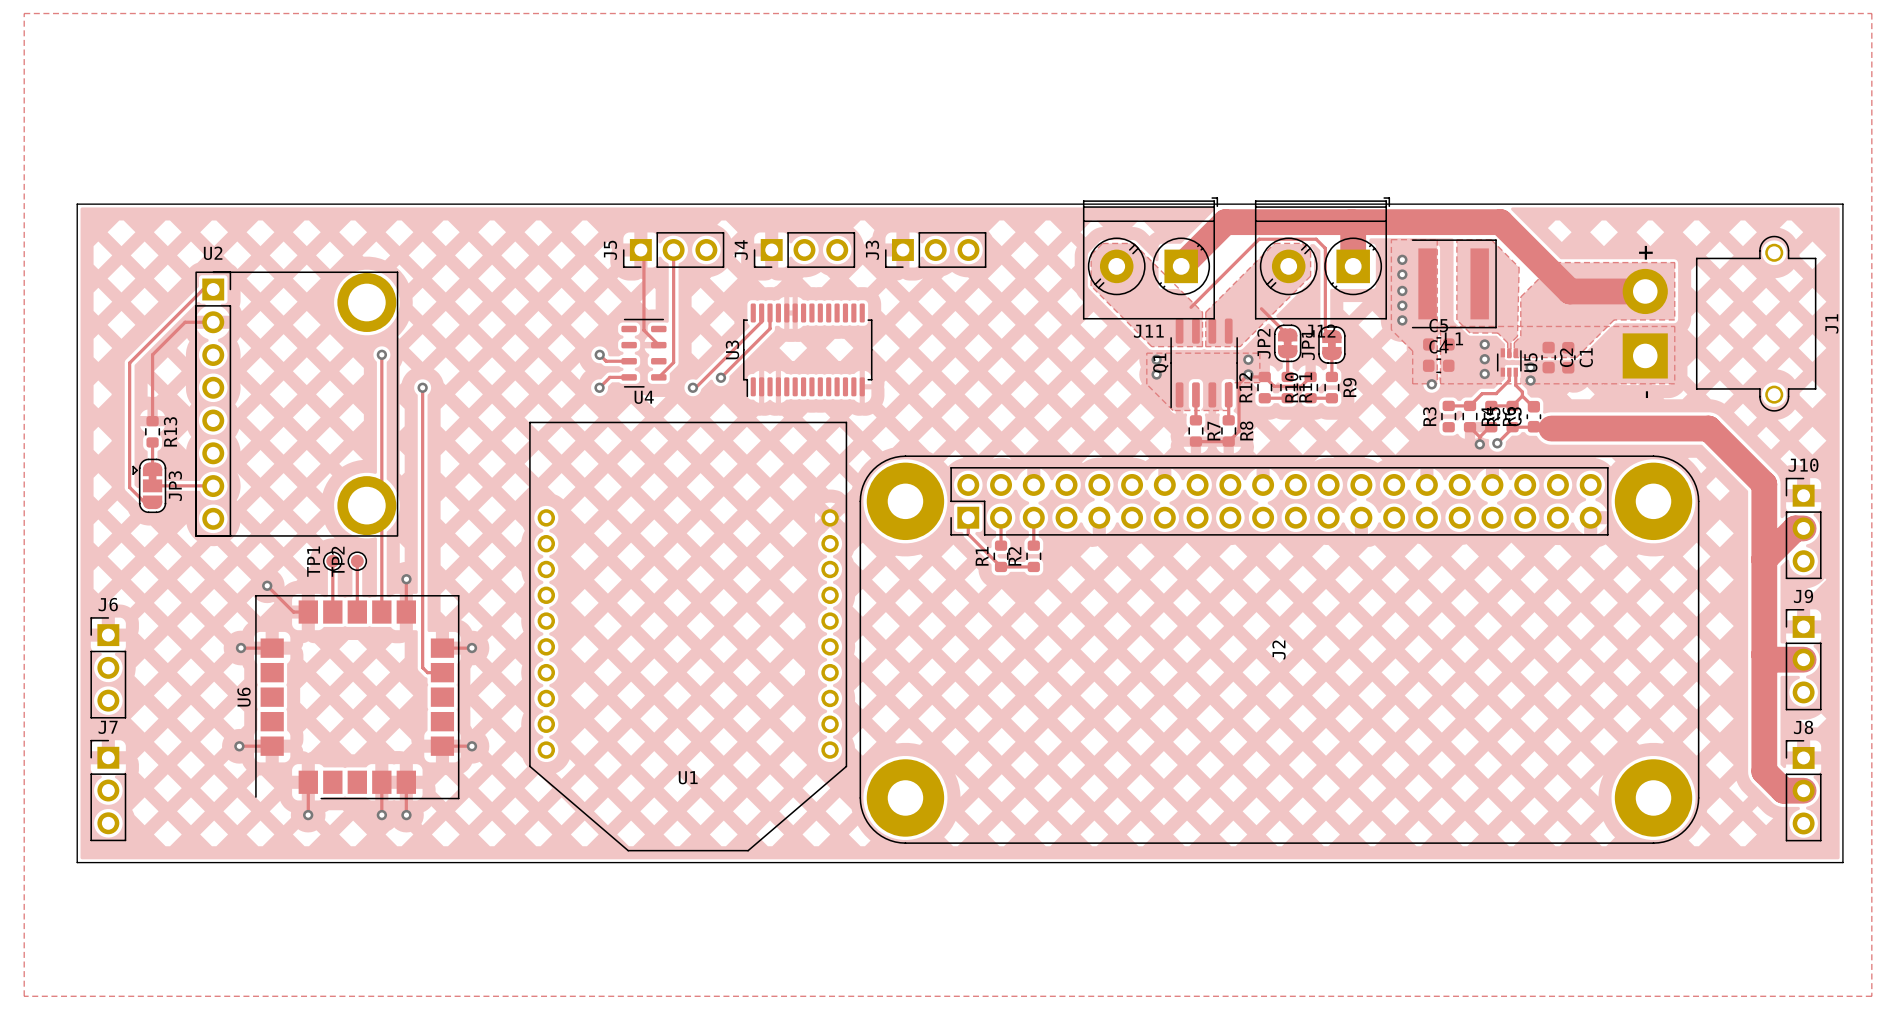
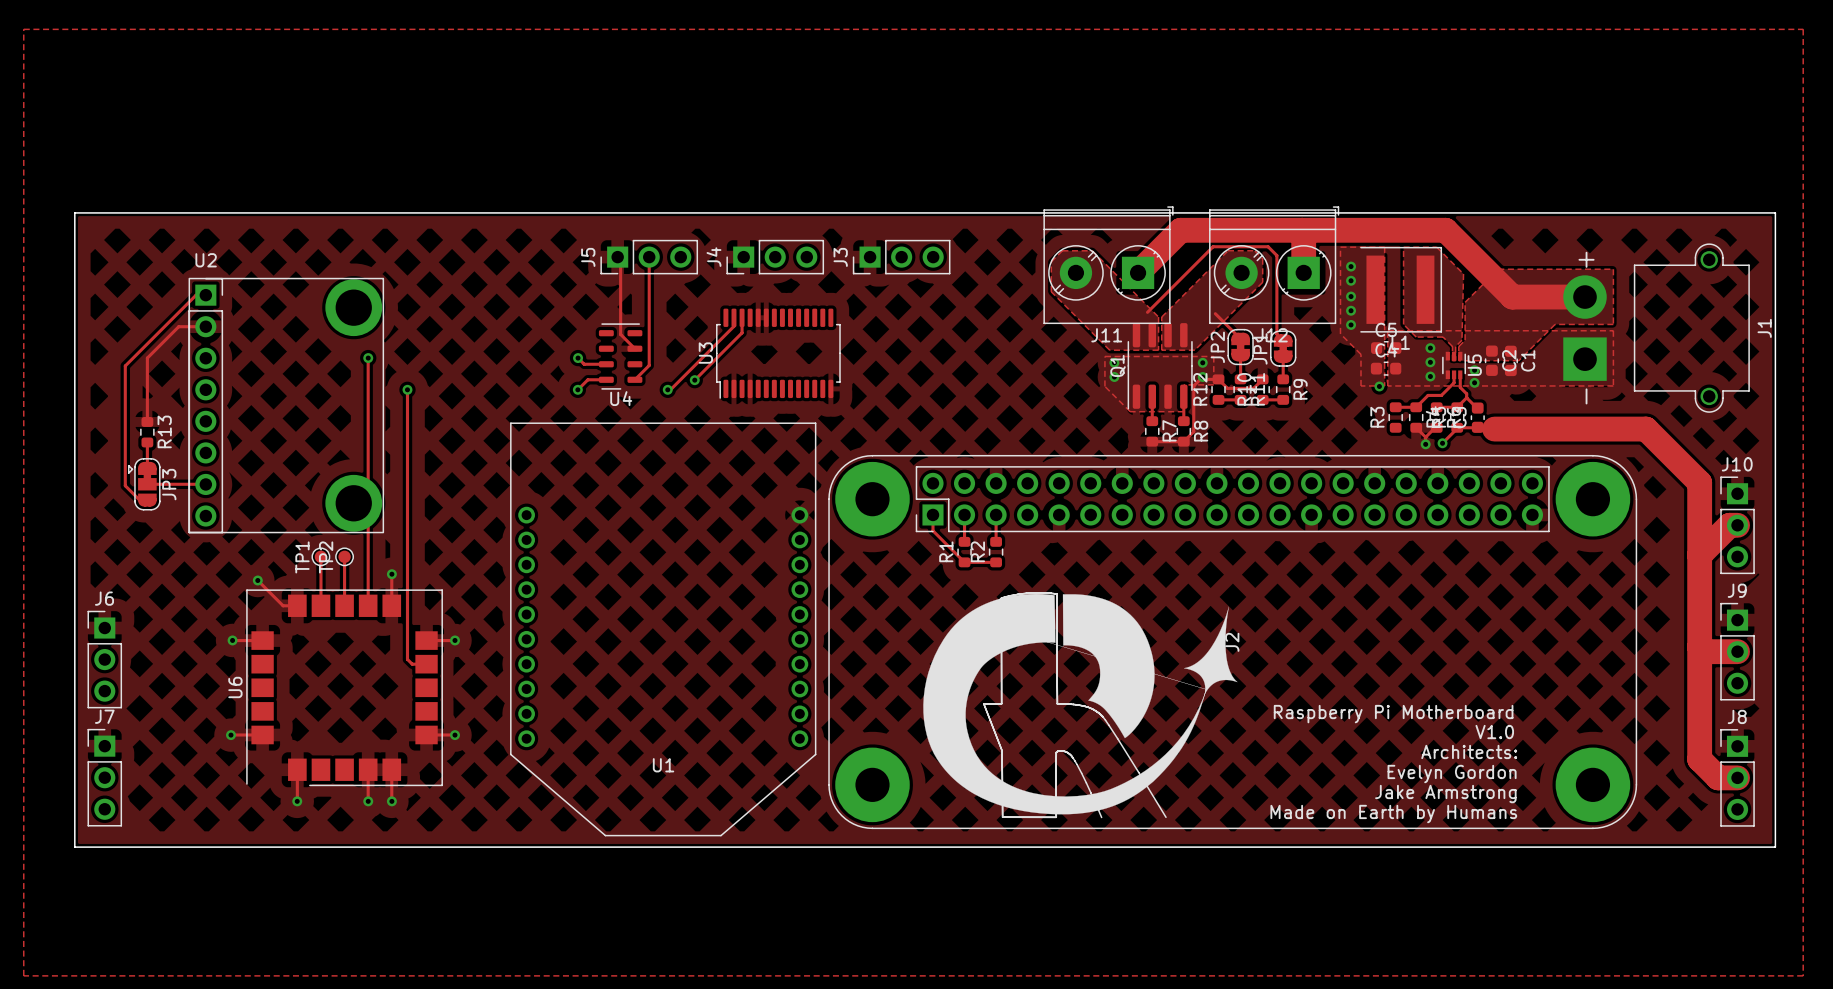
drawing: none -> [923, 593, 1238, 815]
text: none -> Raspberry Pi Motherboard (1393, 714)
text: none -> V1.0 (1494, 732)
text: none -> Architects: (1469, 751)
line: none -> (1056, 752) (1064, 751) (1072, 757) (1101, 817)
line: none -> (1056, 752) (1056, 817) (1002, 817) (1002, 750) (983, 703) (1001, 703) (1002, 597) (1030, 593) (1056, 594) (1057, 703) (1085, 706) (1102, 716) (1166, 817)
text: none -> Evelyn Gordon (1452, 774)
text: none -> Jake Armstrong (1445, 794)
text: none -> Made on Earth by Humans (1393, 814)

